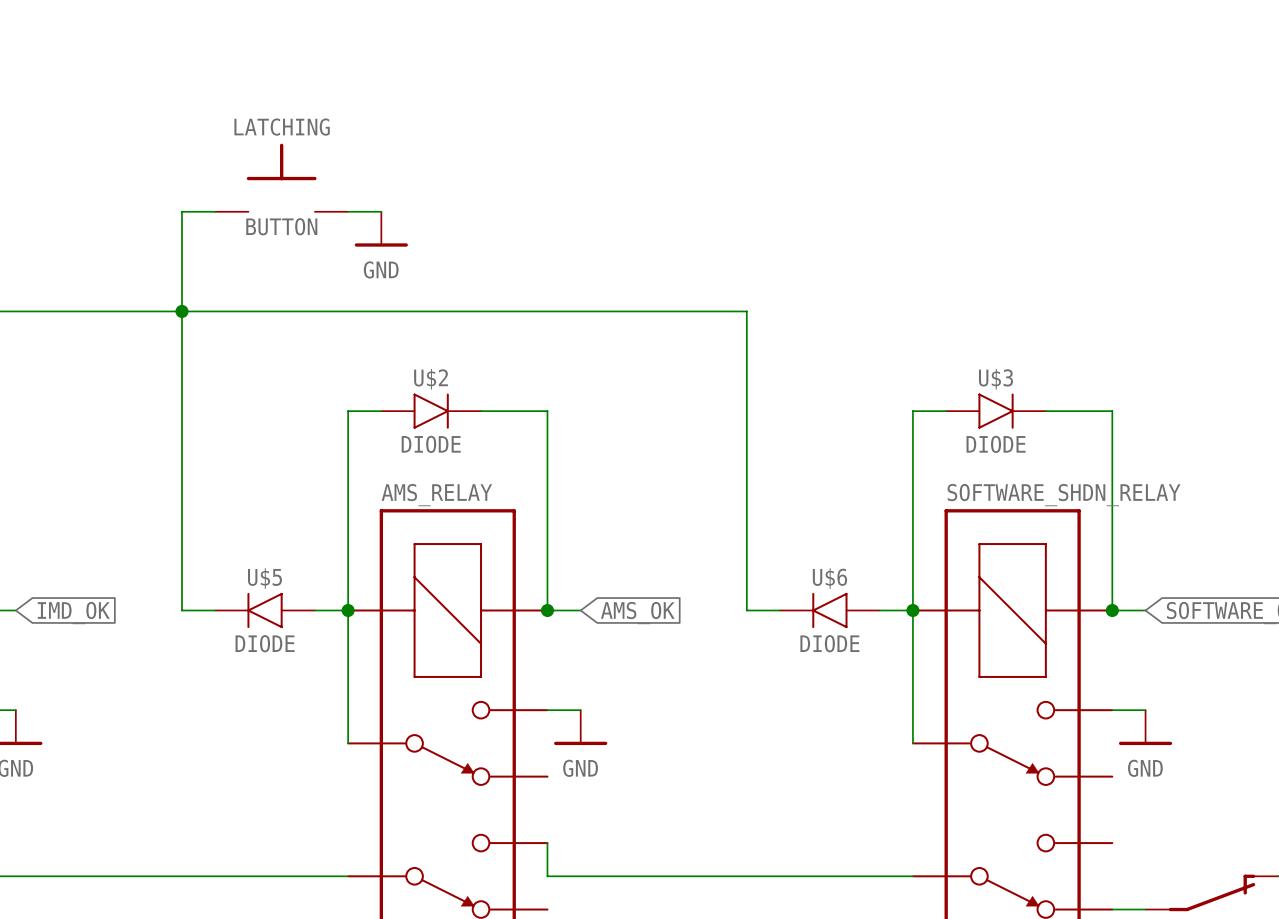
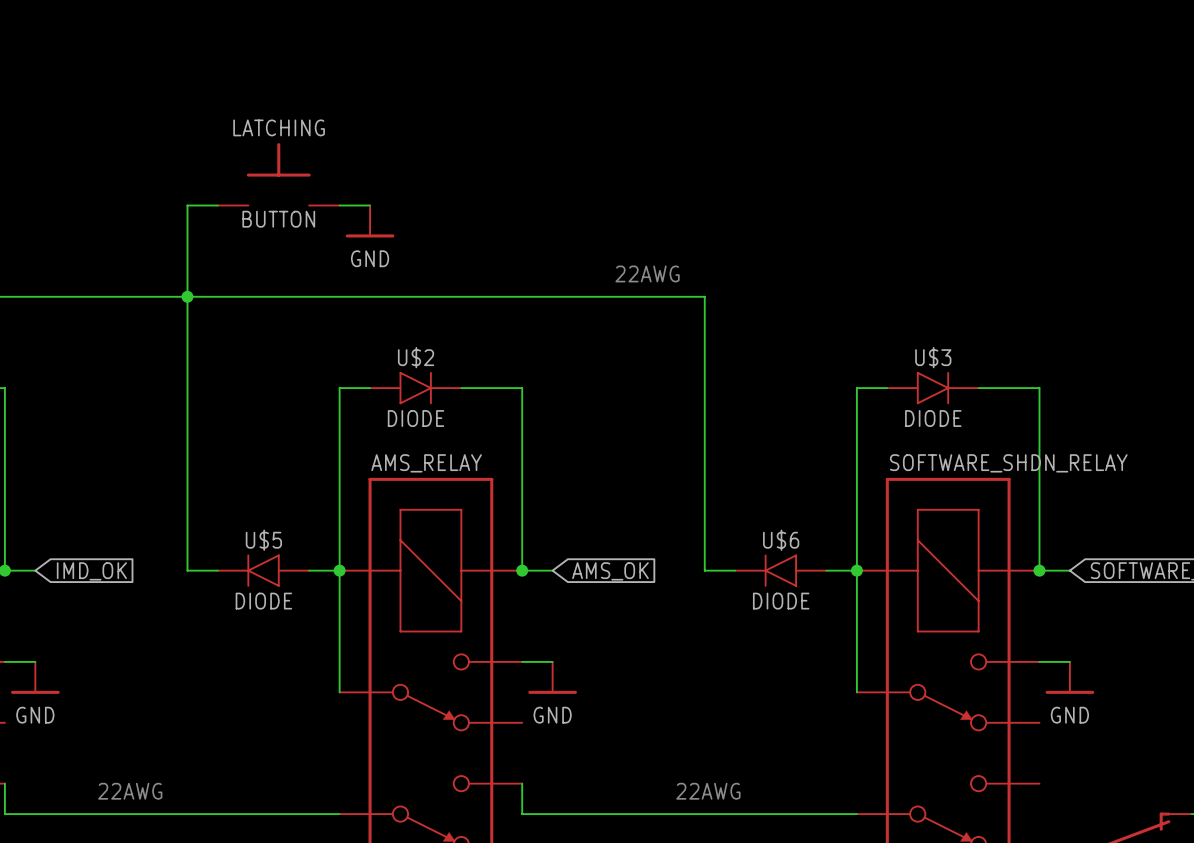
text: none -> 22AWG (647, 273)
text: none -> 22AWG (130, 791)
text: none -> 22AWG (708, 791)

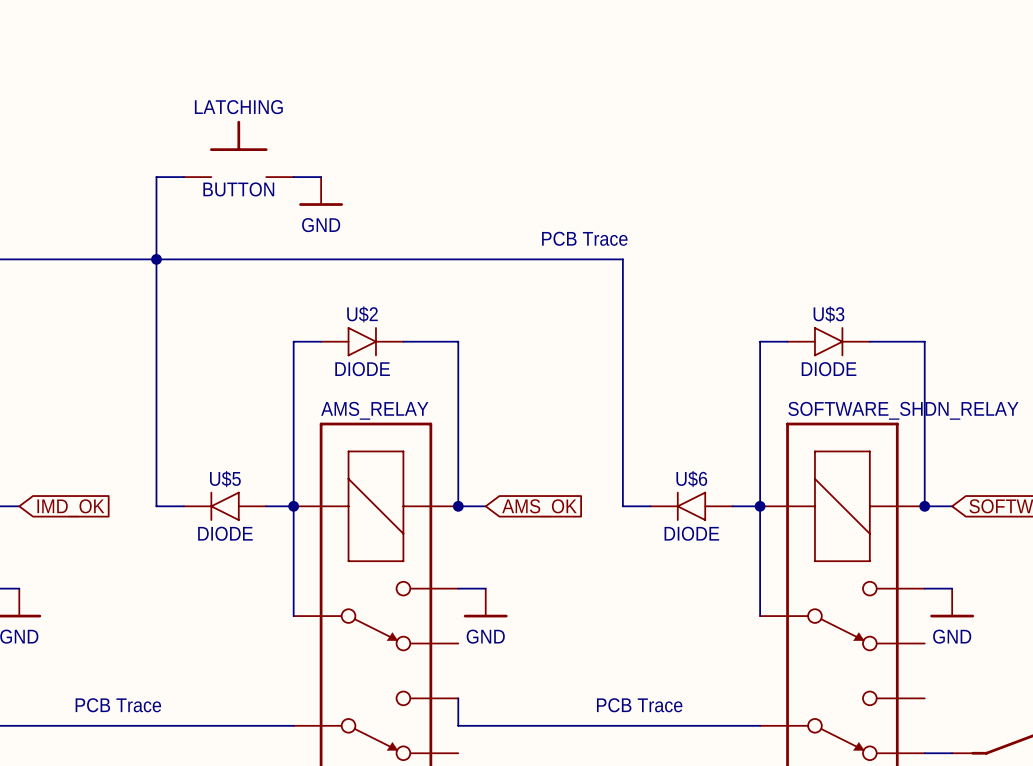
text: 22AWG (647, 273) -> PCB Trace (584, 238)
text: 22AWG (130, 791) -> PCB Trace (118, 705)
text: 22AWG (708, 791) -> PCB Trace (639, 705)

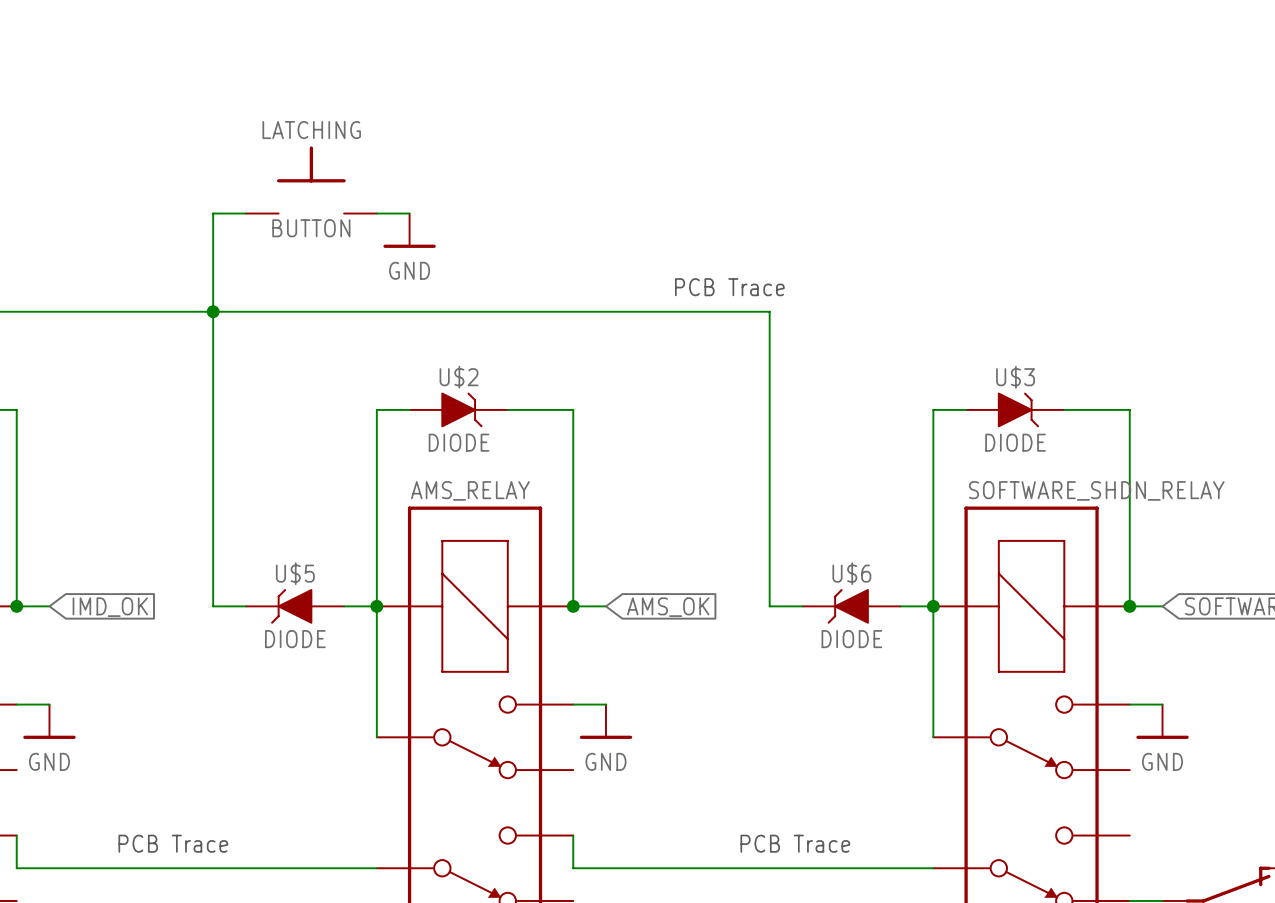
U$2 symbol: [321, 327, 404, 357] -> [409, 392, 508, 428]
U$3 symbol: [787, 327, 870, 357] -> [966, 392, 1065, 428]
U$5 symbol: [183, 491, 267, 521] -> [245, 589, 345, 624]
U$6 symbol: [650, 491, 733, 521] -> [802, 589, 901, 624]

